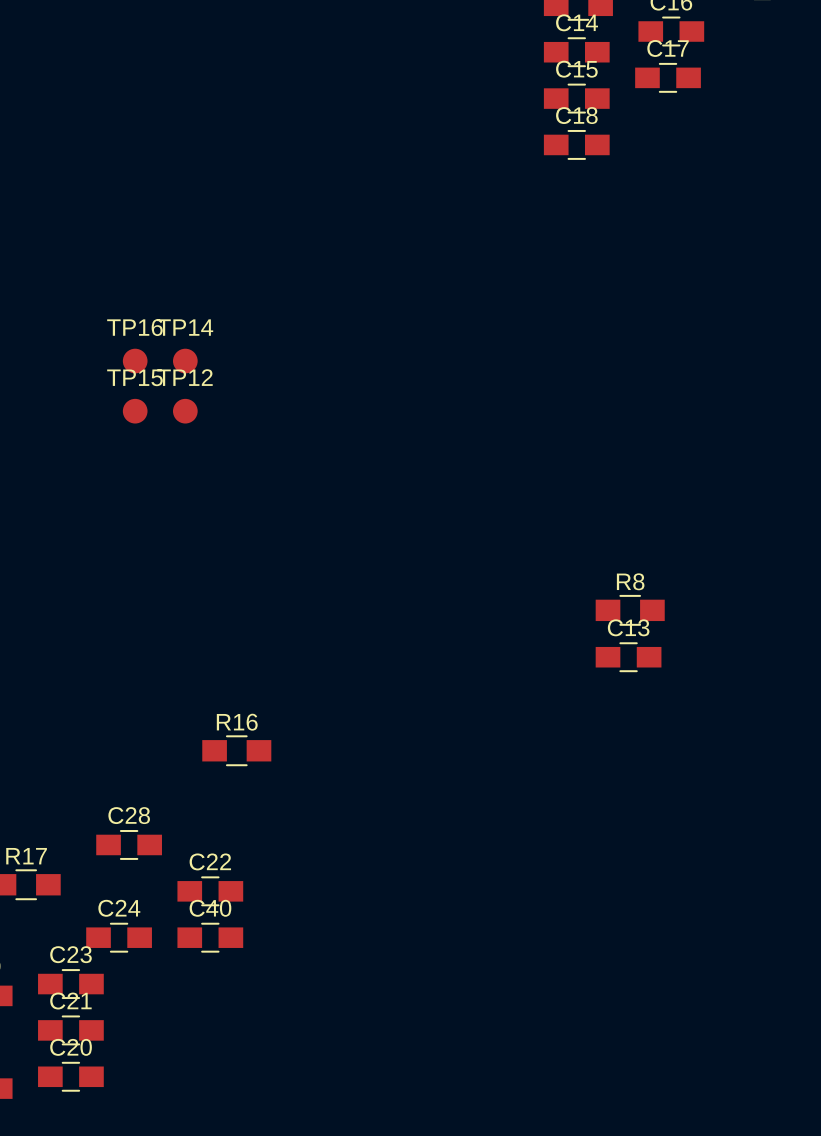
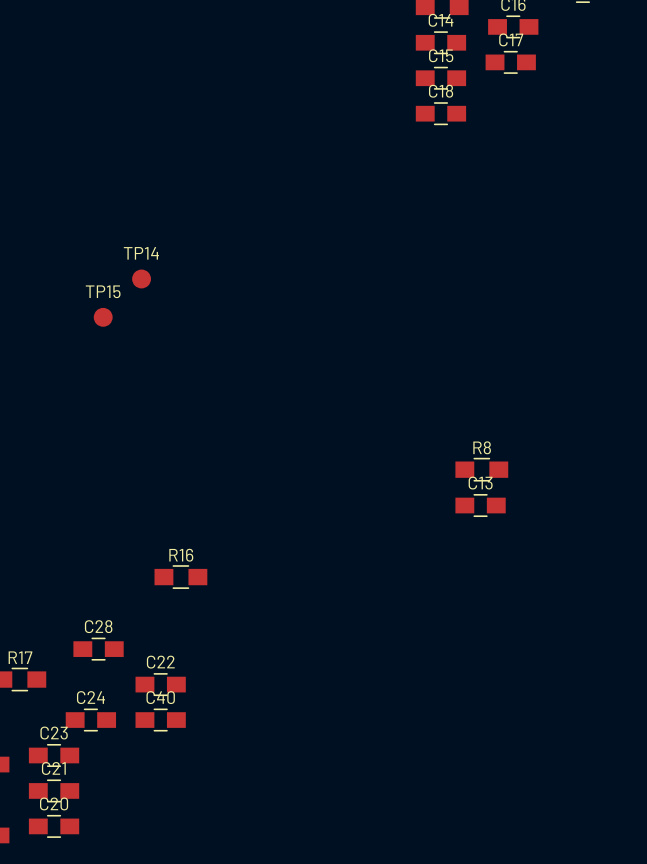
TP16: (135, 361) -> none
TP12: (185, 411) -> none

